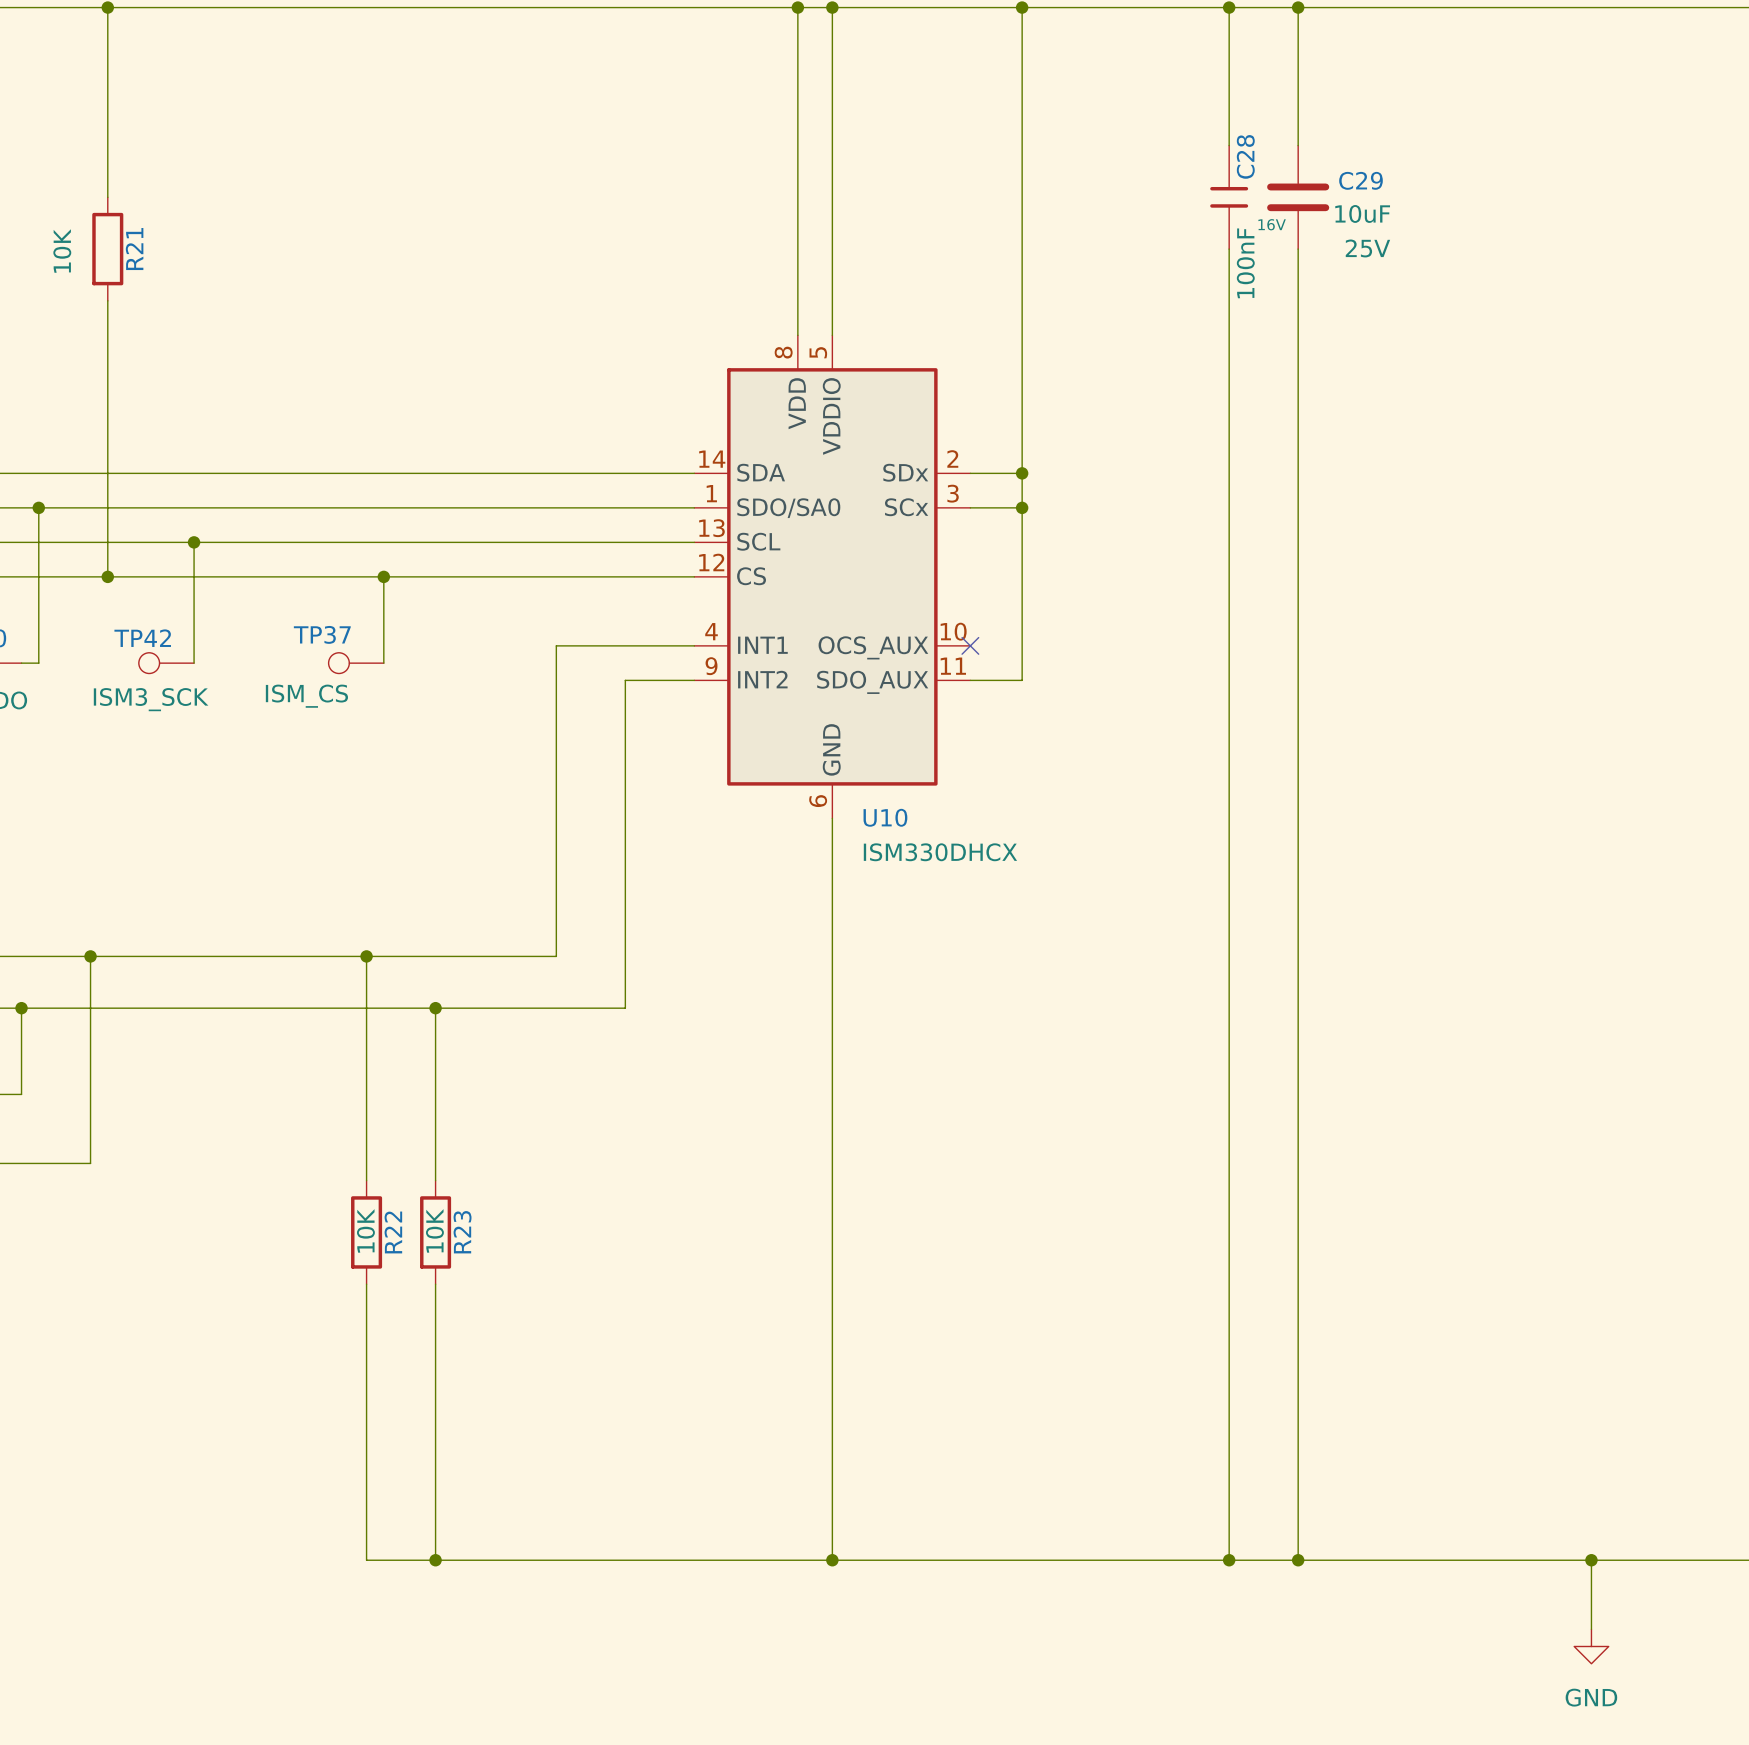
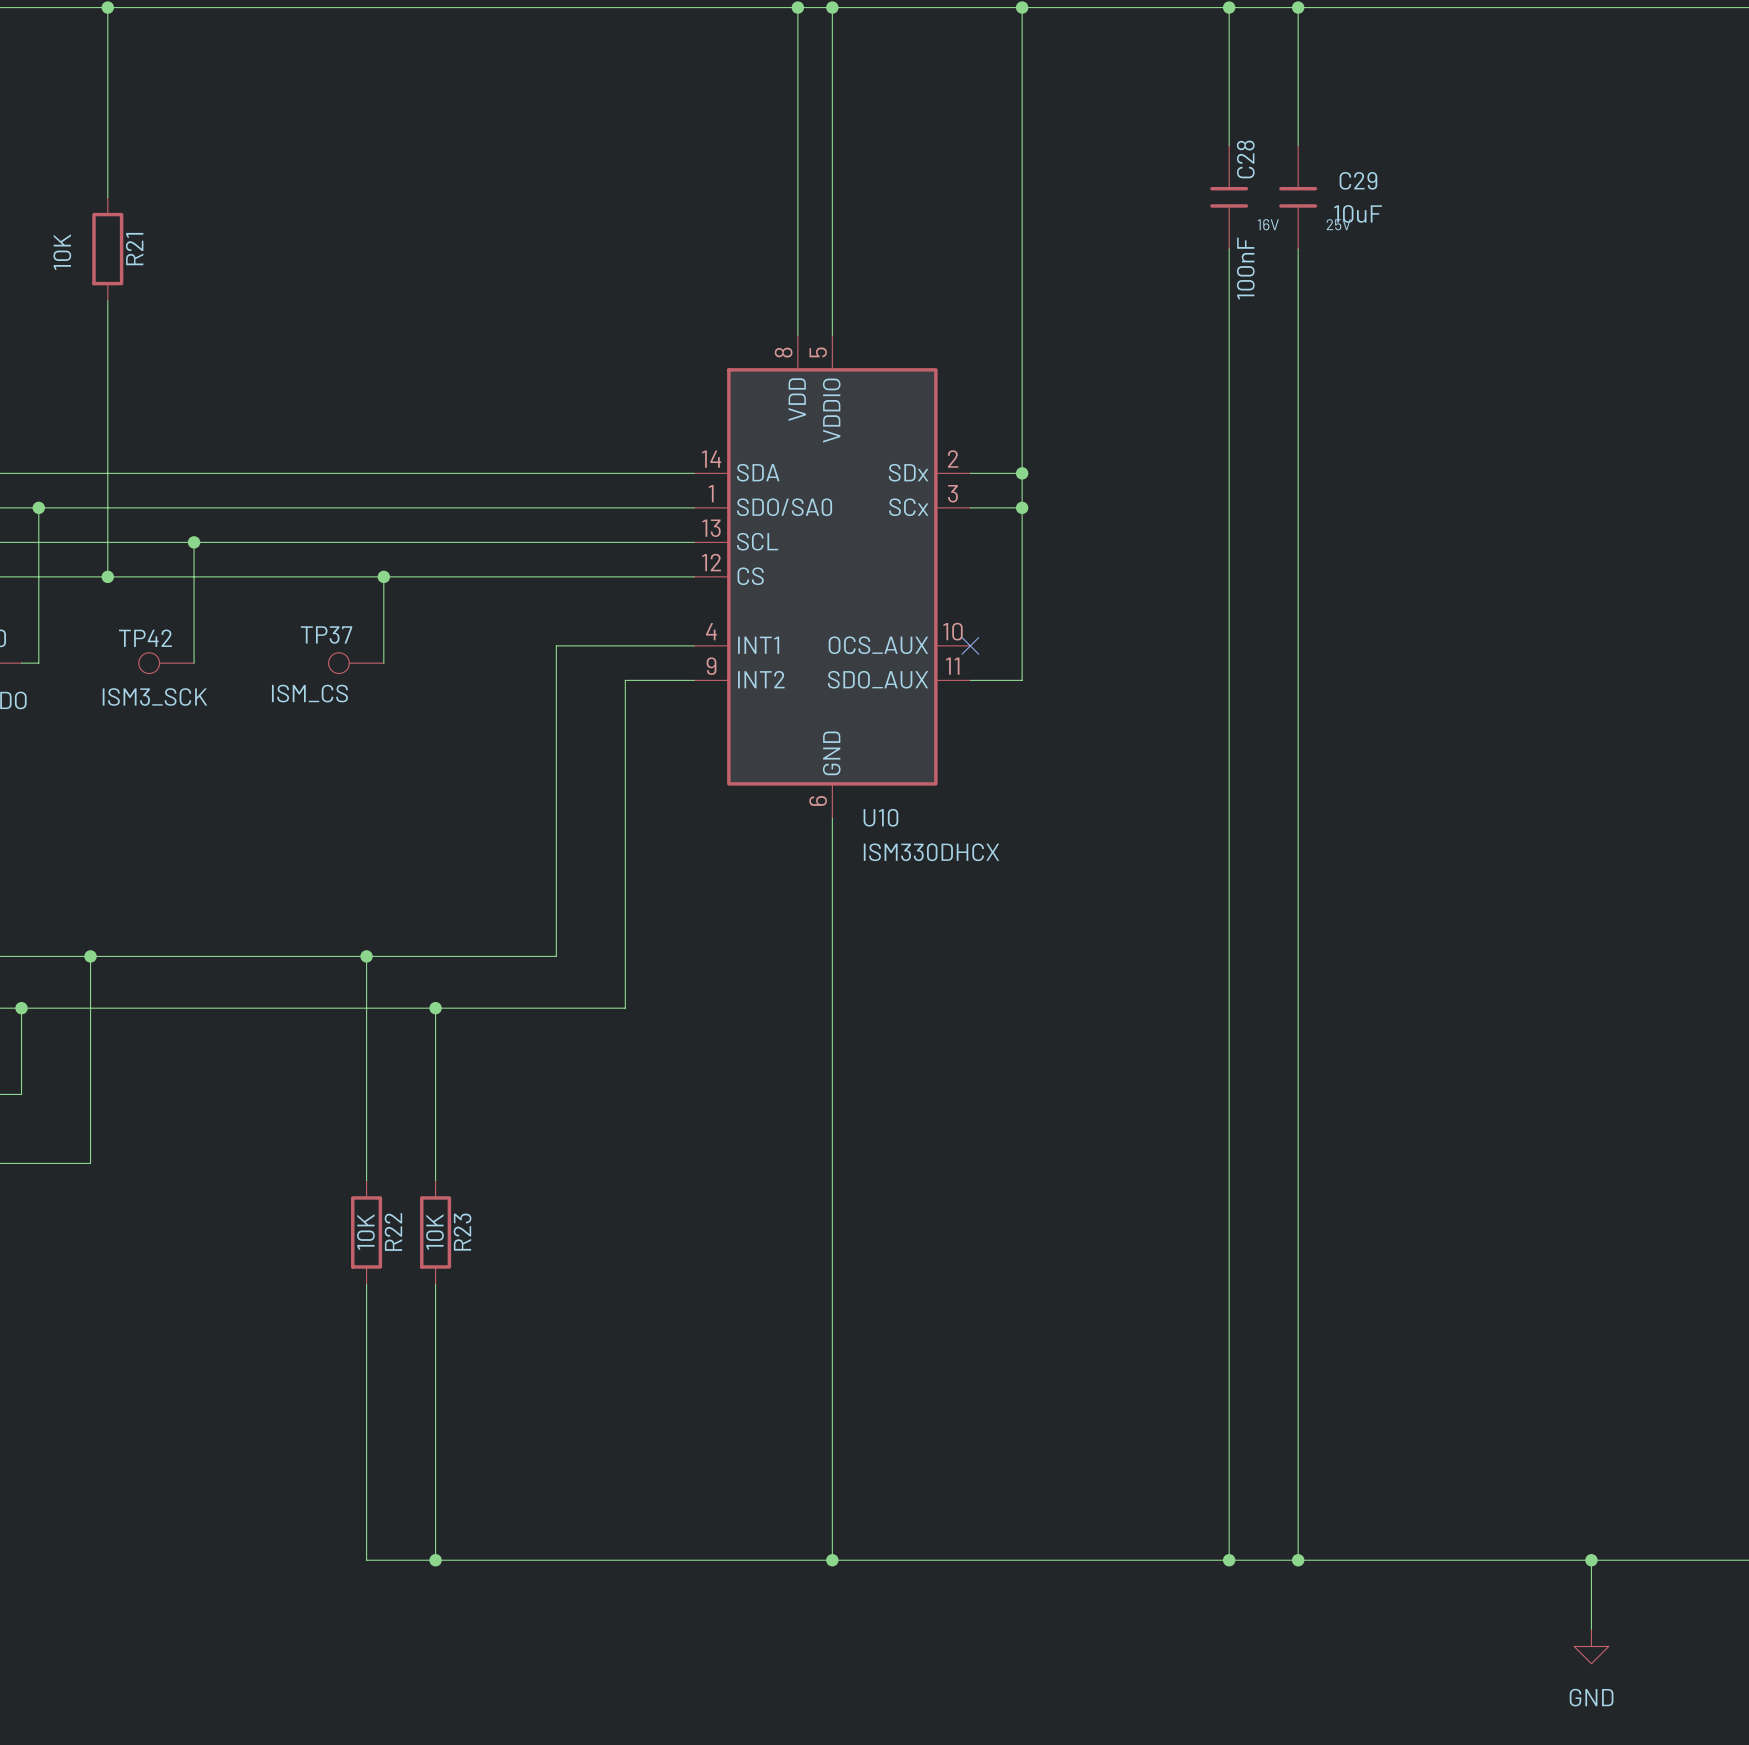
C29 symbol: [1267, 145, 1330, 250] -> [1279, 145, 1318, 250]
C29 text: none -> 25V (1338, 224)
C29 text: 25V (1367, 248) -> none

